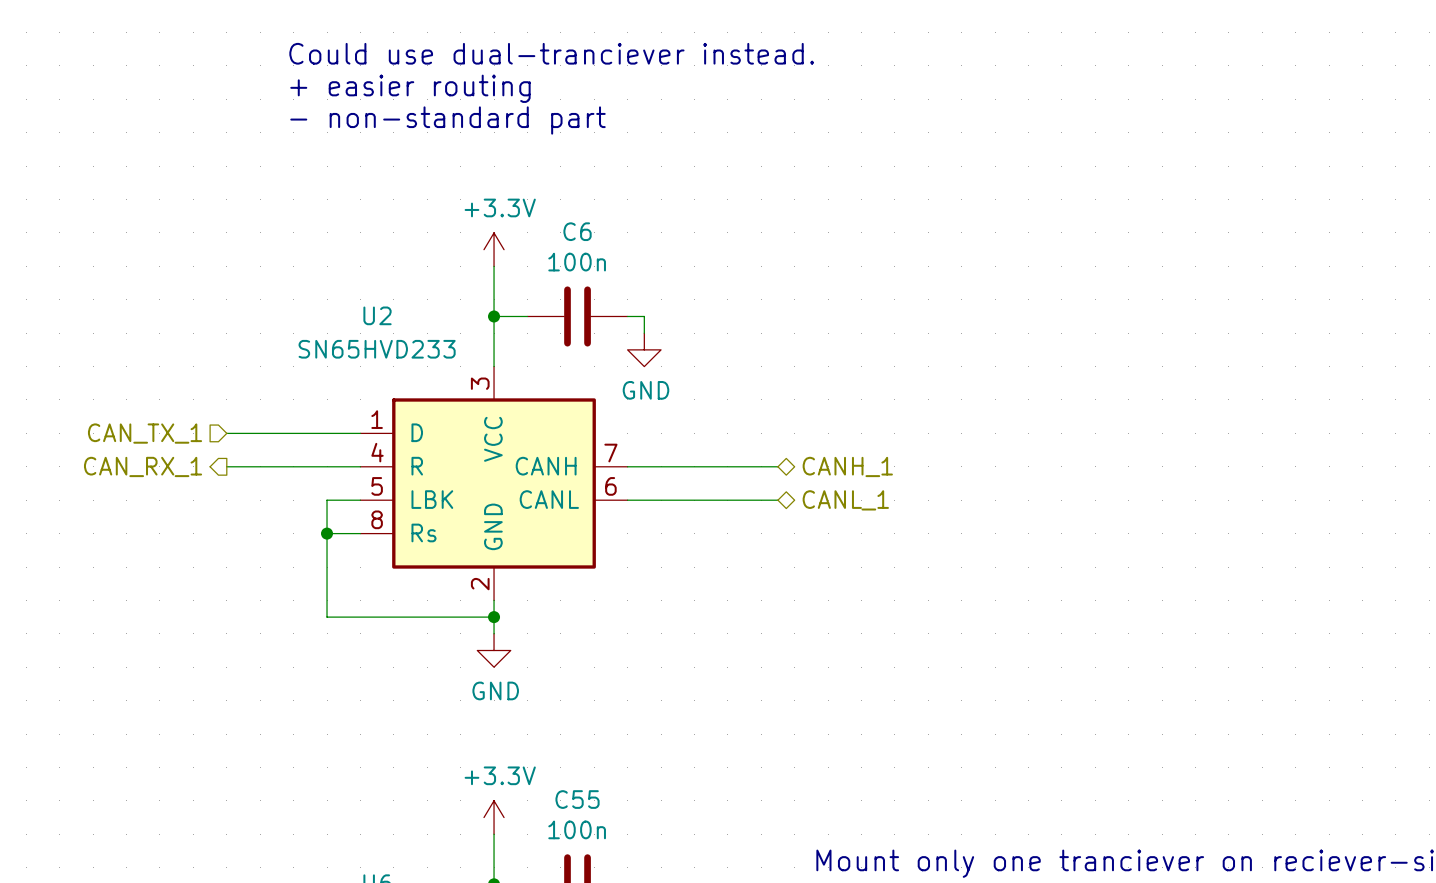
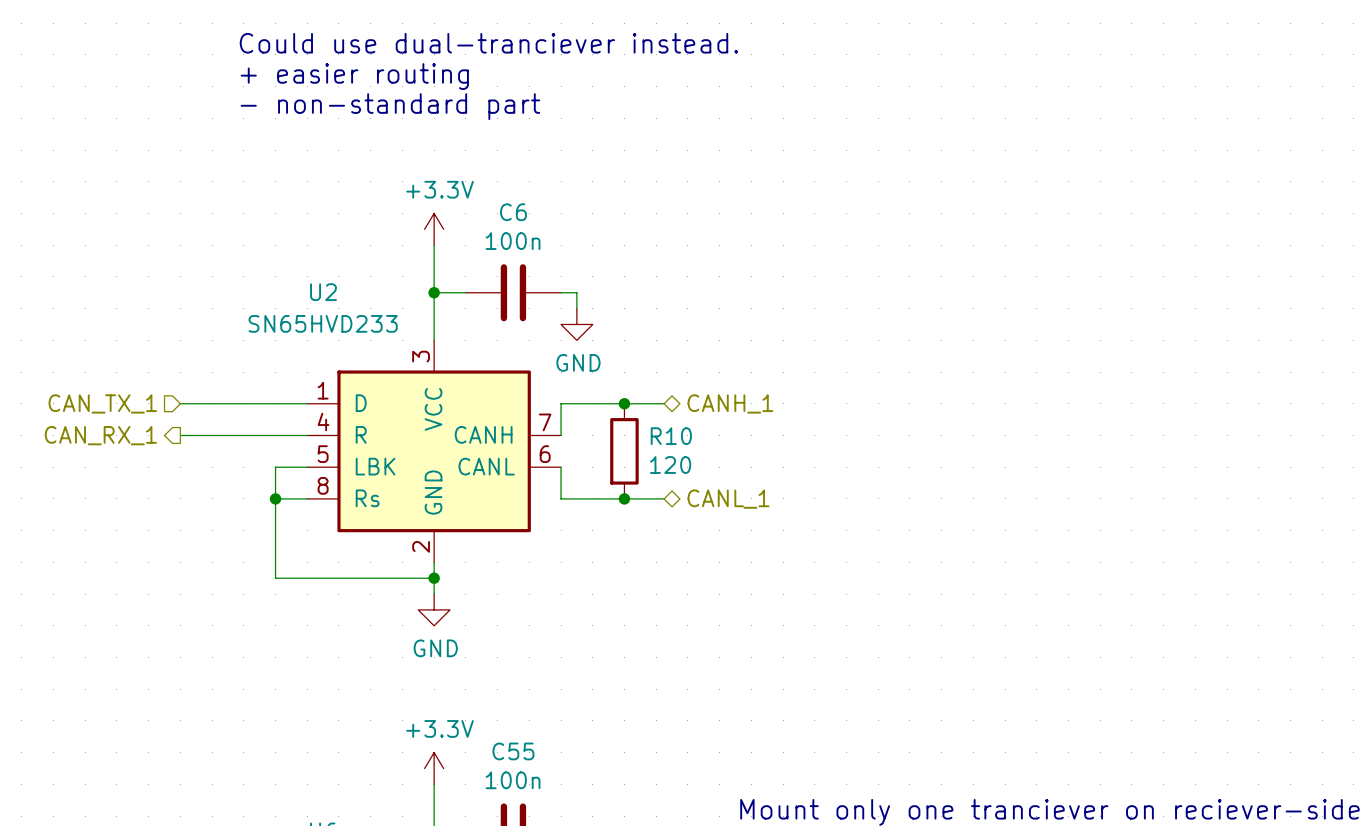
junction: none -> (624, 403)
wire: (627, 466) (777, 466) -> (561, 435) (561, 403) (664, 403)
hierarchical label position: CANH_1 (847, 466) -> CANH_1 (730, 403)
R10: none -> 120 (624, 451)
wire: (627, 500) (777, 500) -> (561, 467) (561, 498) (664, 498)
hierarchical label position: CANL_1 (845, 500) -> CANL_1 (728, 499)
junction: none -> (624, 498)

